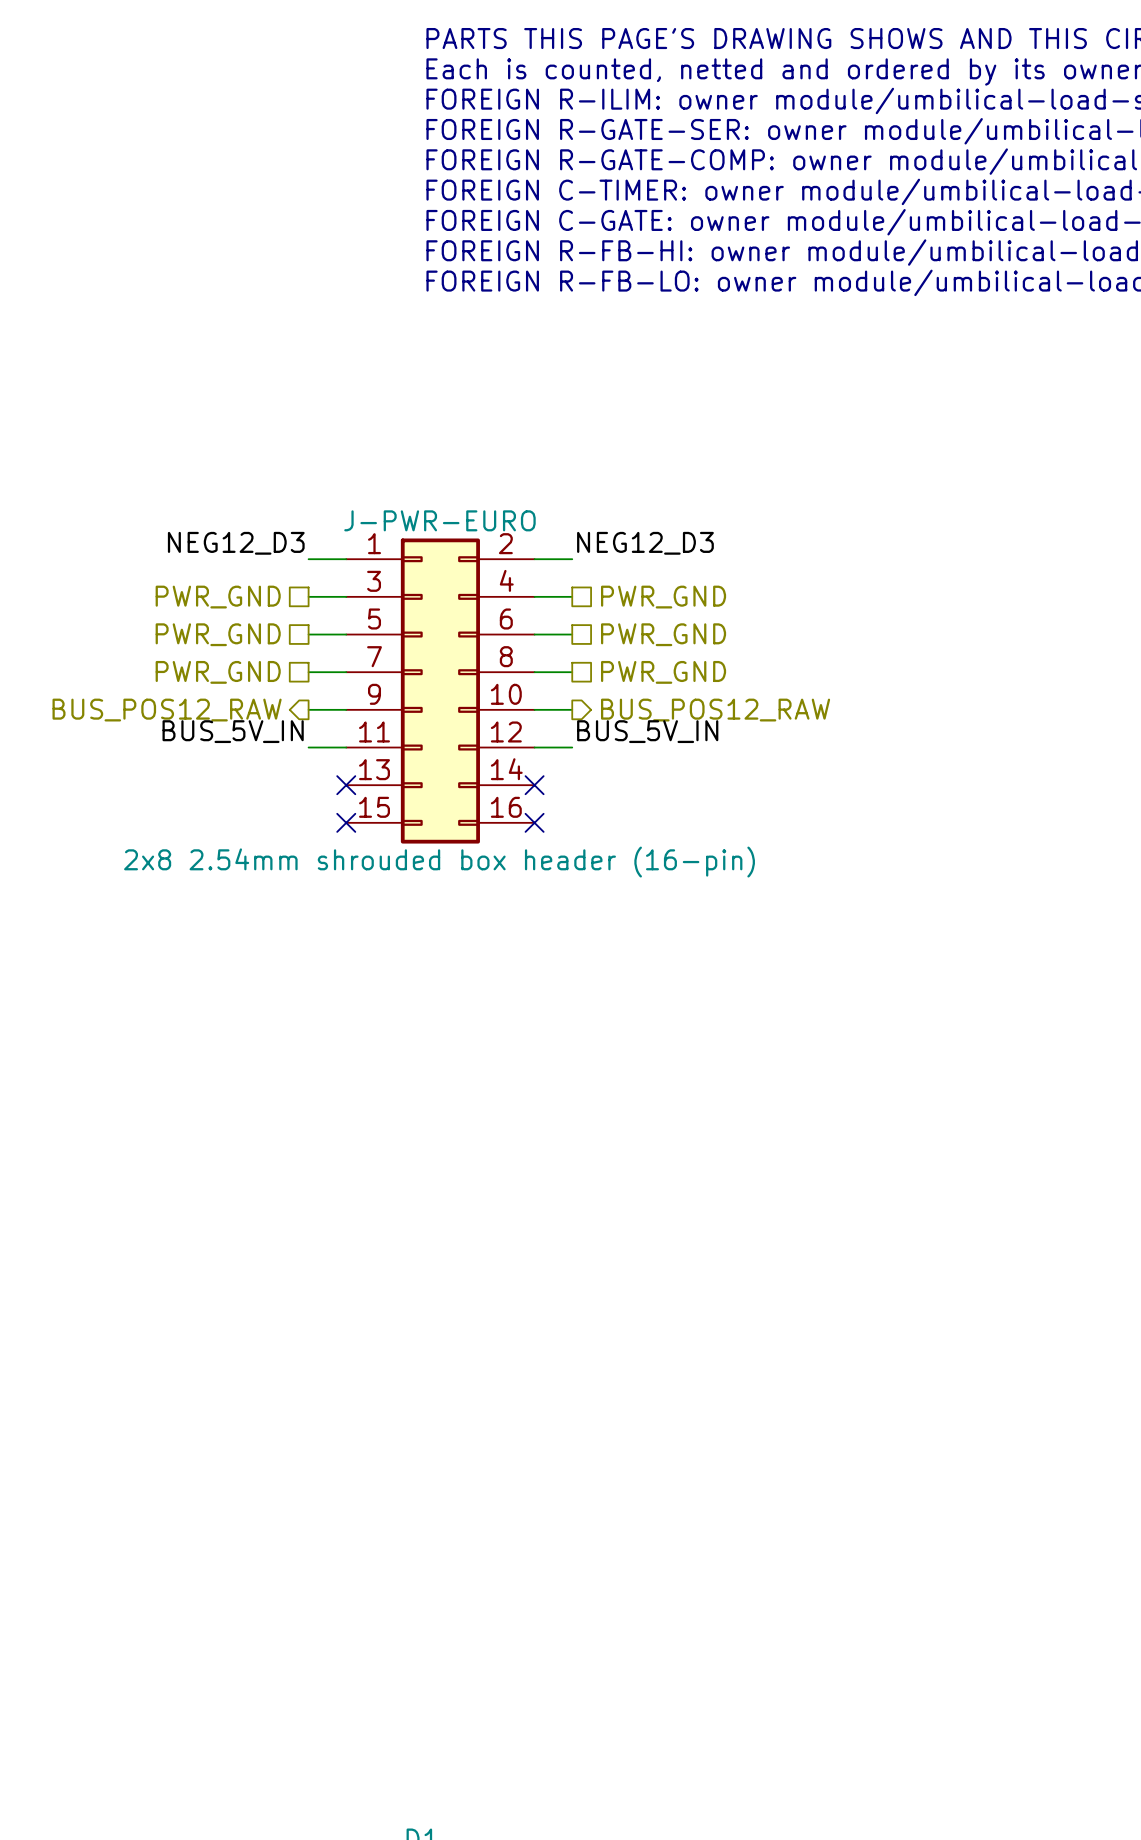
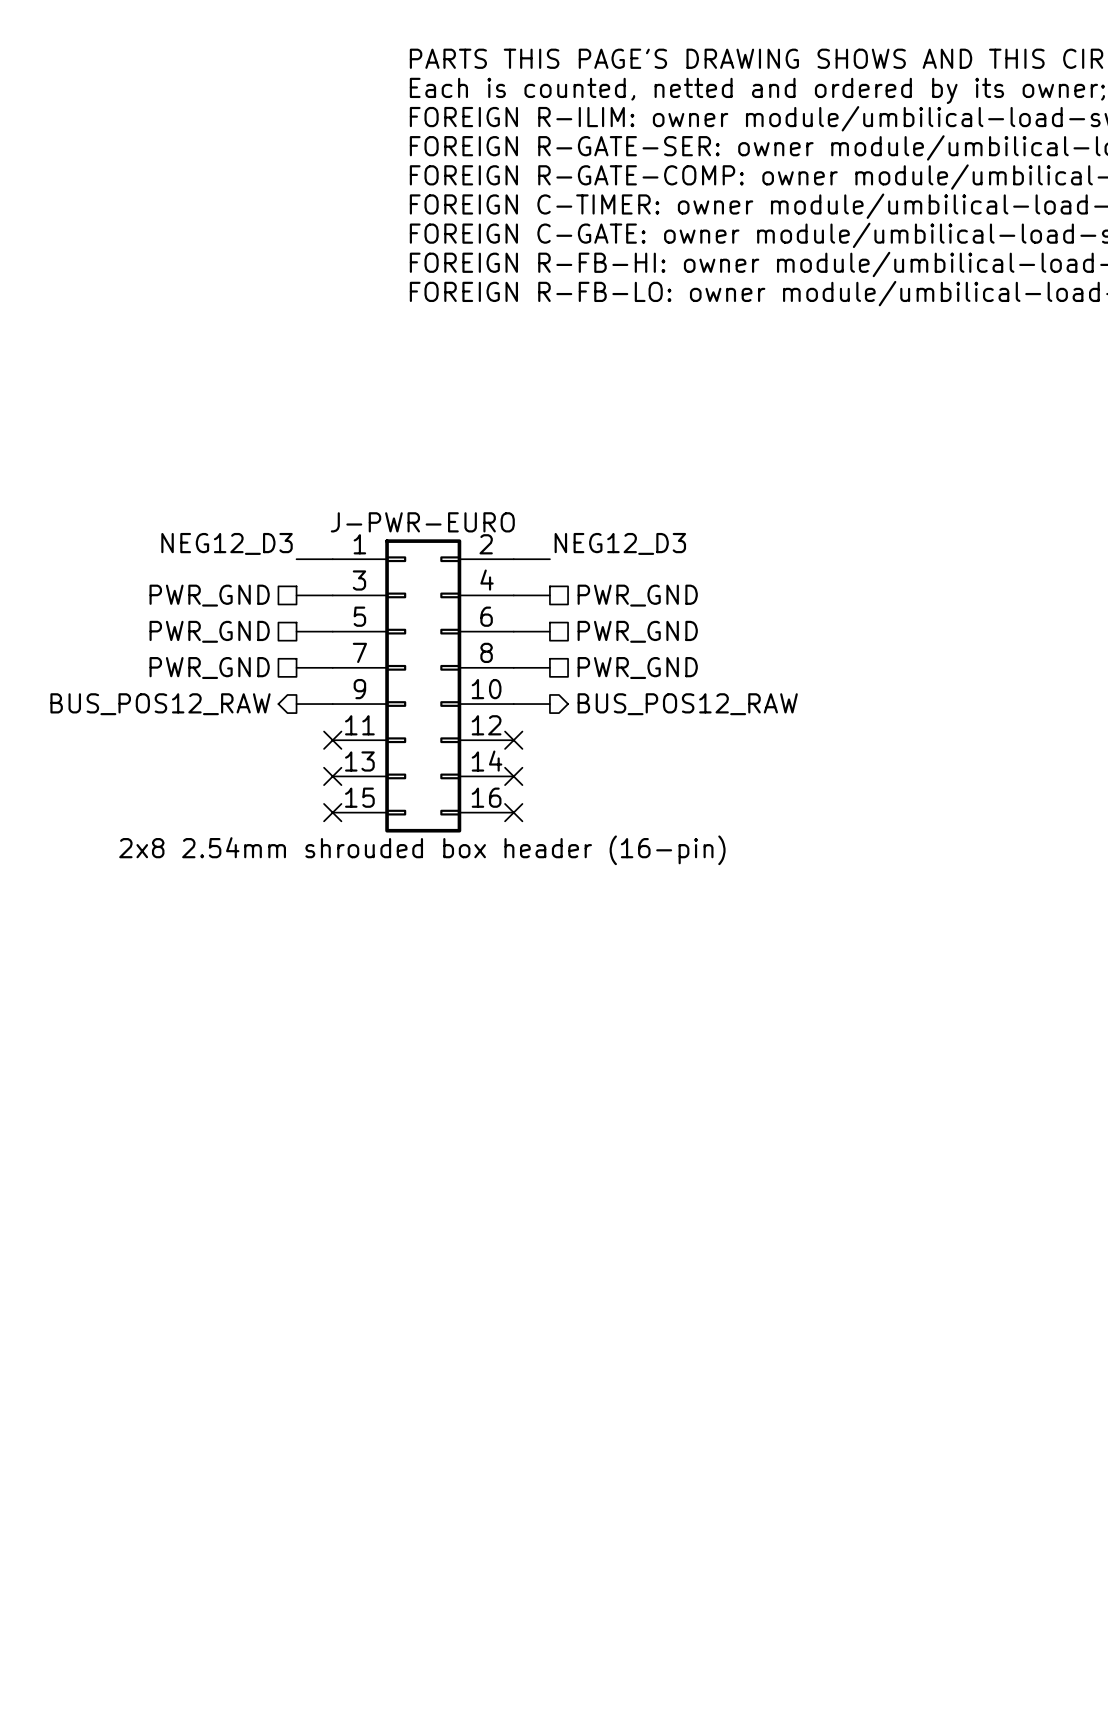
label: BUS_5V_IN (233, 731) -> none
label: BUS_5V_IN (647, 731) -> none
wire: (308, 747) (346, 747) -> none
no-connect mark: none -> (332, 740)
wire: (534, 747) (572, 747) -> none
no-connect mark: none -> (513, 740)

